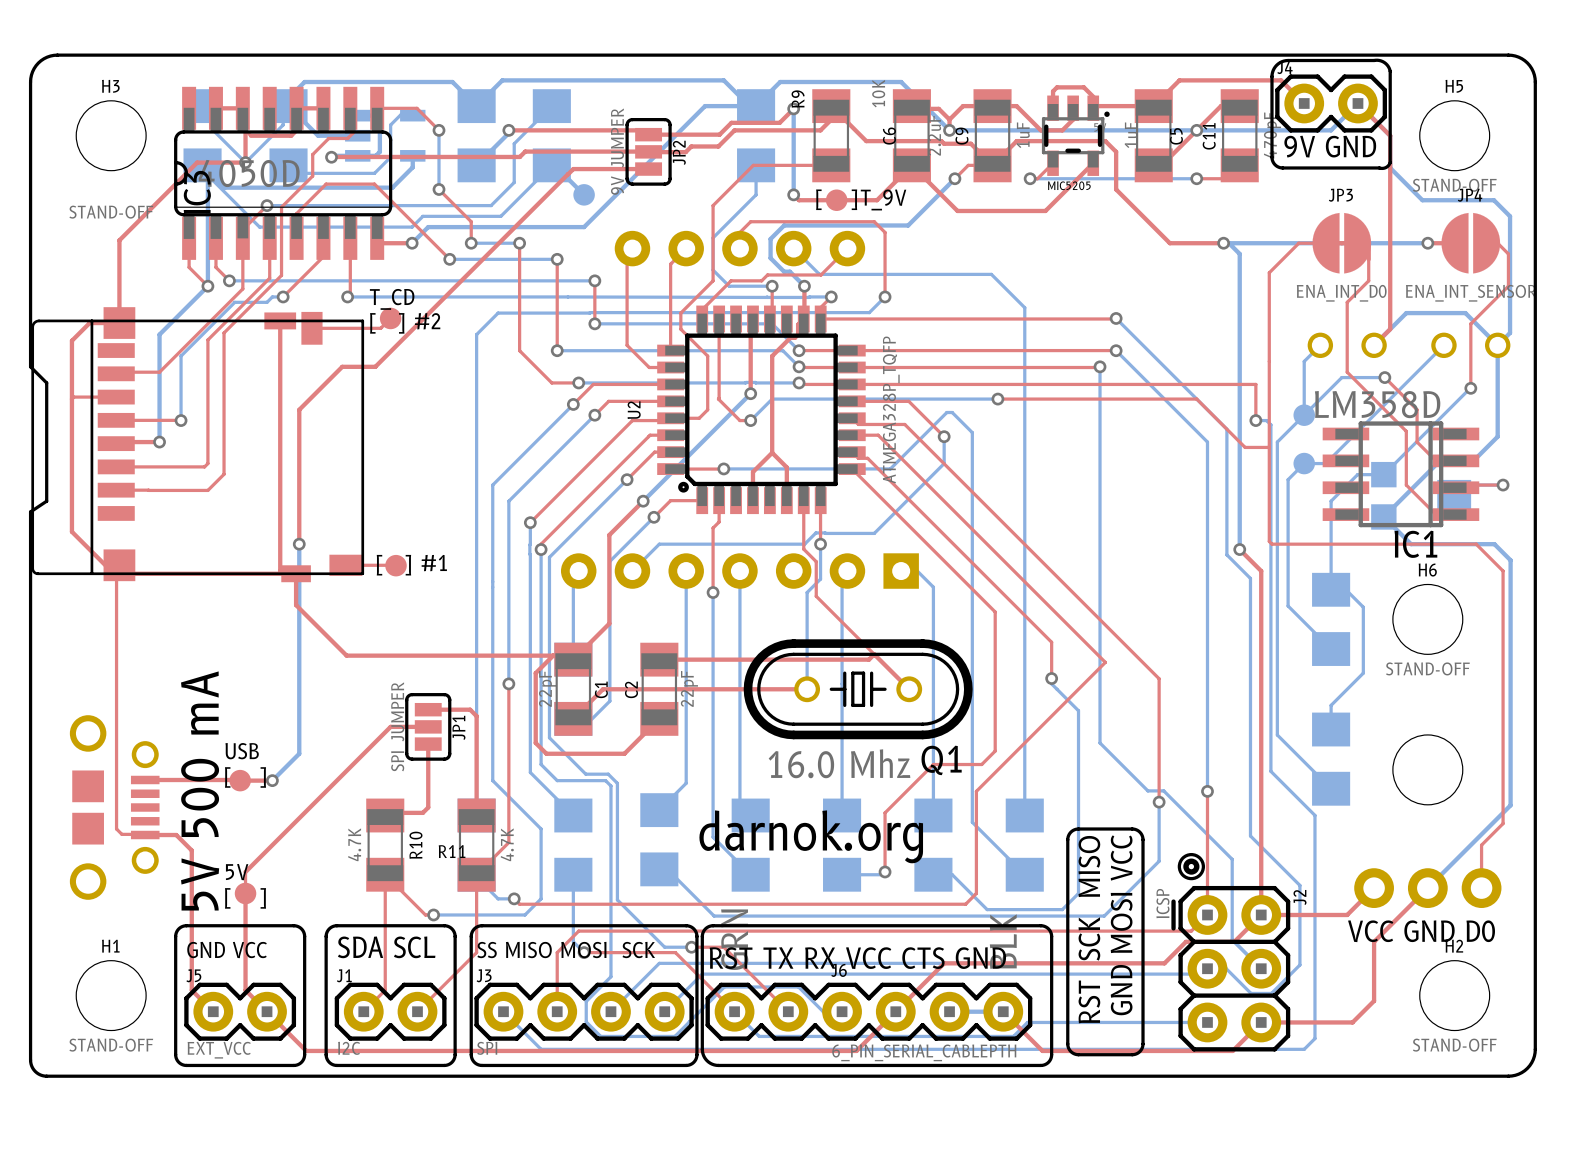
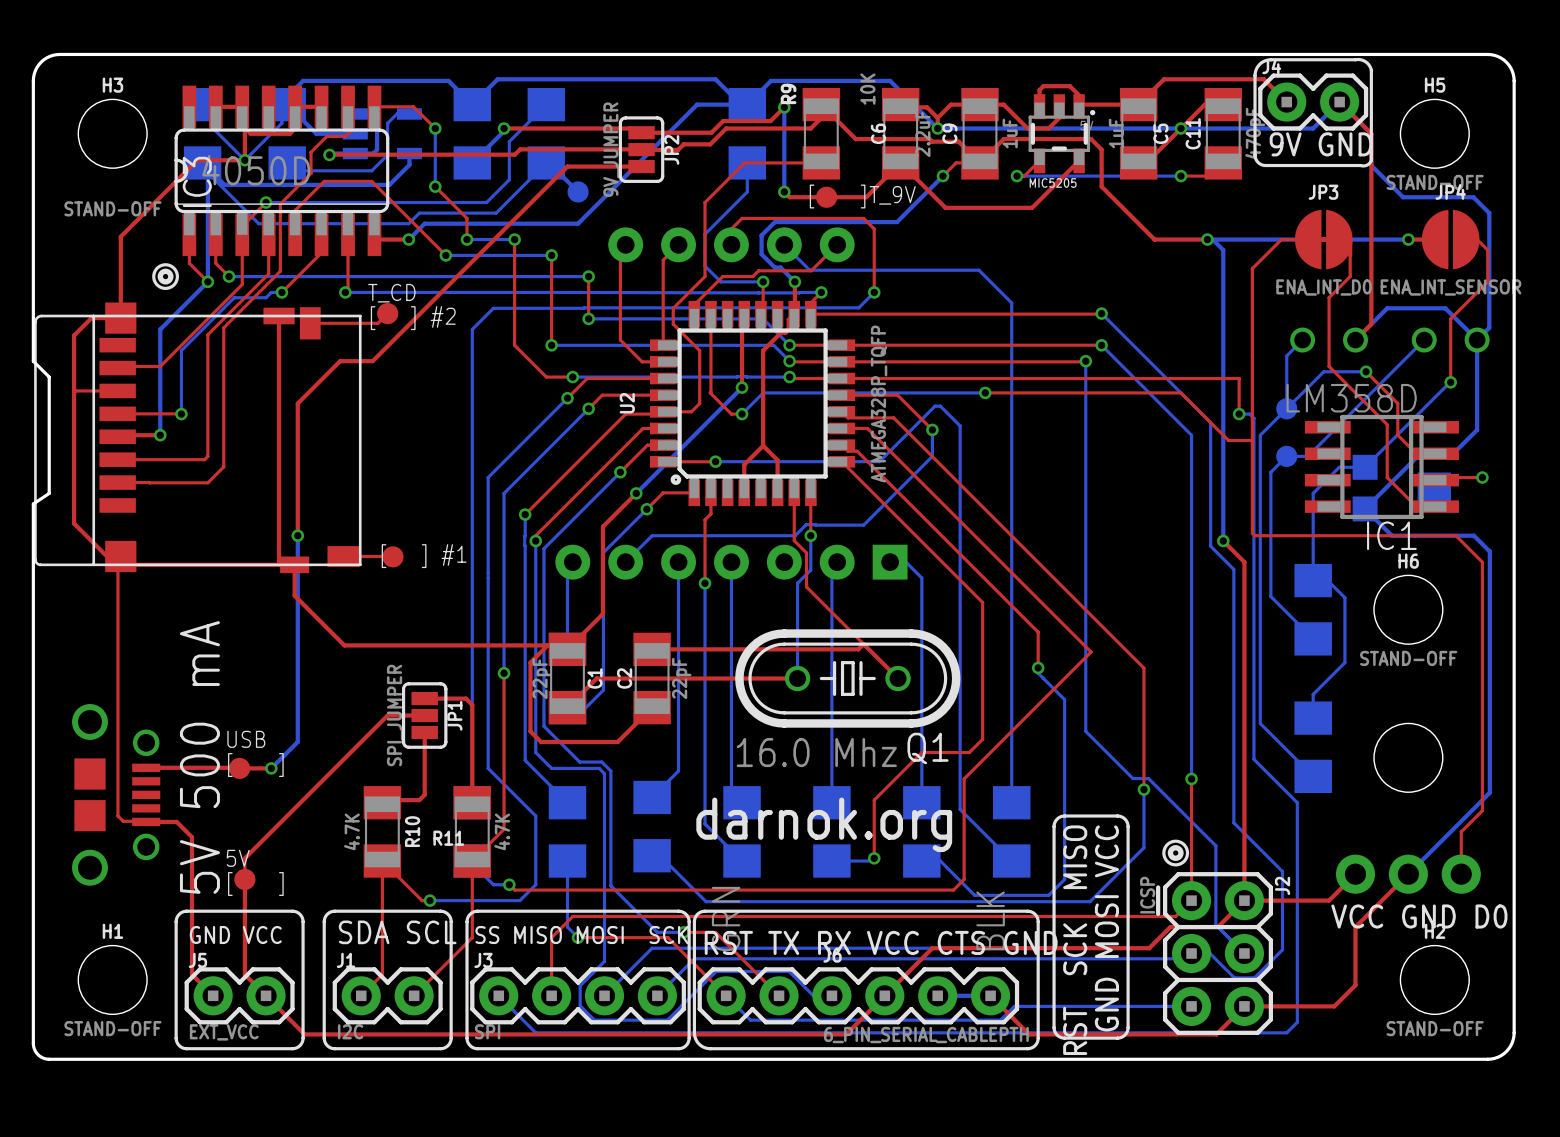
drawing: none -> [152, 263, 179, 290]

